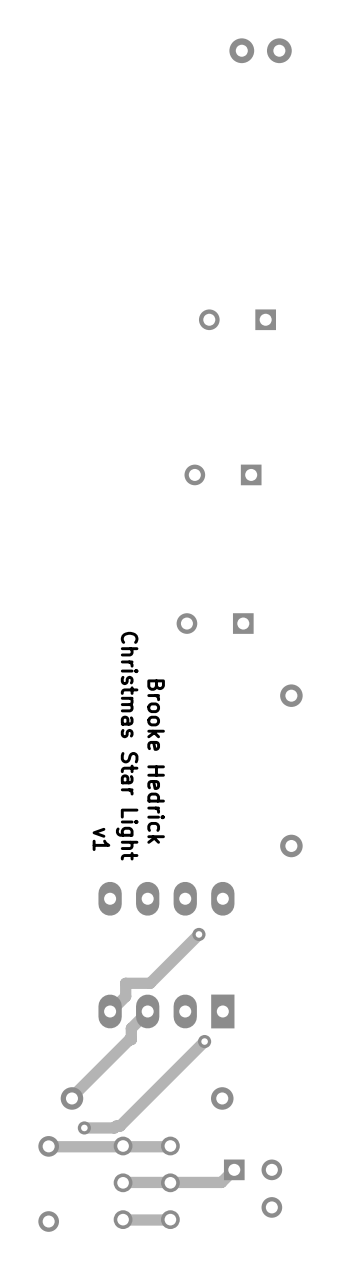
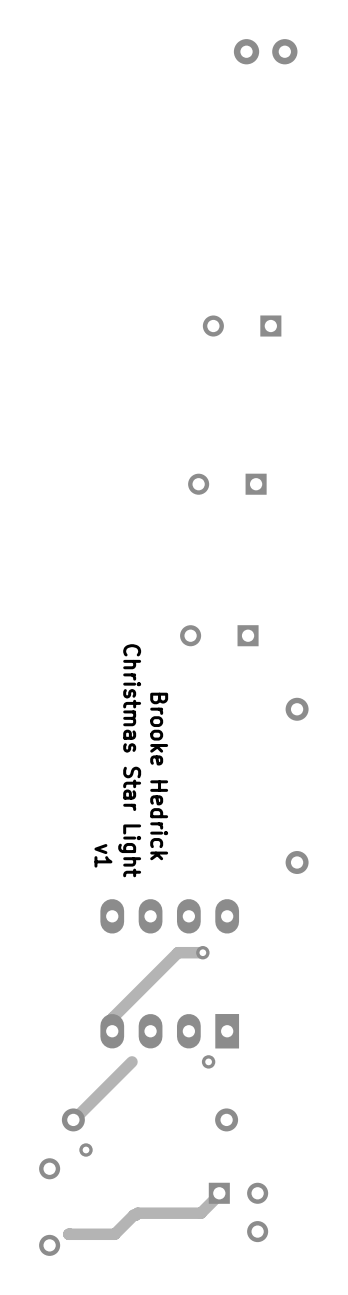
track: (198, 934) (150, 983) (125, 983) (125, 996) (110, 1011) -> (202, 952) (177, 952) (112, 1017) (112, 1031)
track: (147, 1011) (131, 1028) (131, 1039) (71, 1097) -> (131, 1061) (72, 1119)
track: (204, 1041) (120, 1126) (114, 1127) (84, 1127) -> none
track: (170, 1145) (48, 1146) -> none
track: (234, 1169) (221, 1182) (123, 1182) -> none
track: none -> (219, 1193) (200, 1213) (137, 1213) (114, 1234) (69, 1233)
part: (146, 1182) -> none
part position: (253, 1188) -> (238, 1212)
track: (170, 1219) (123, 1219) -> none

